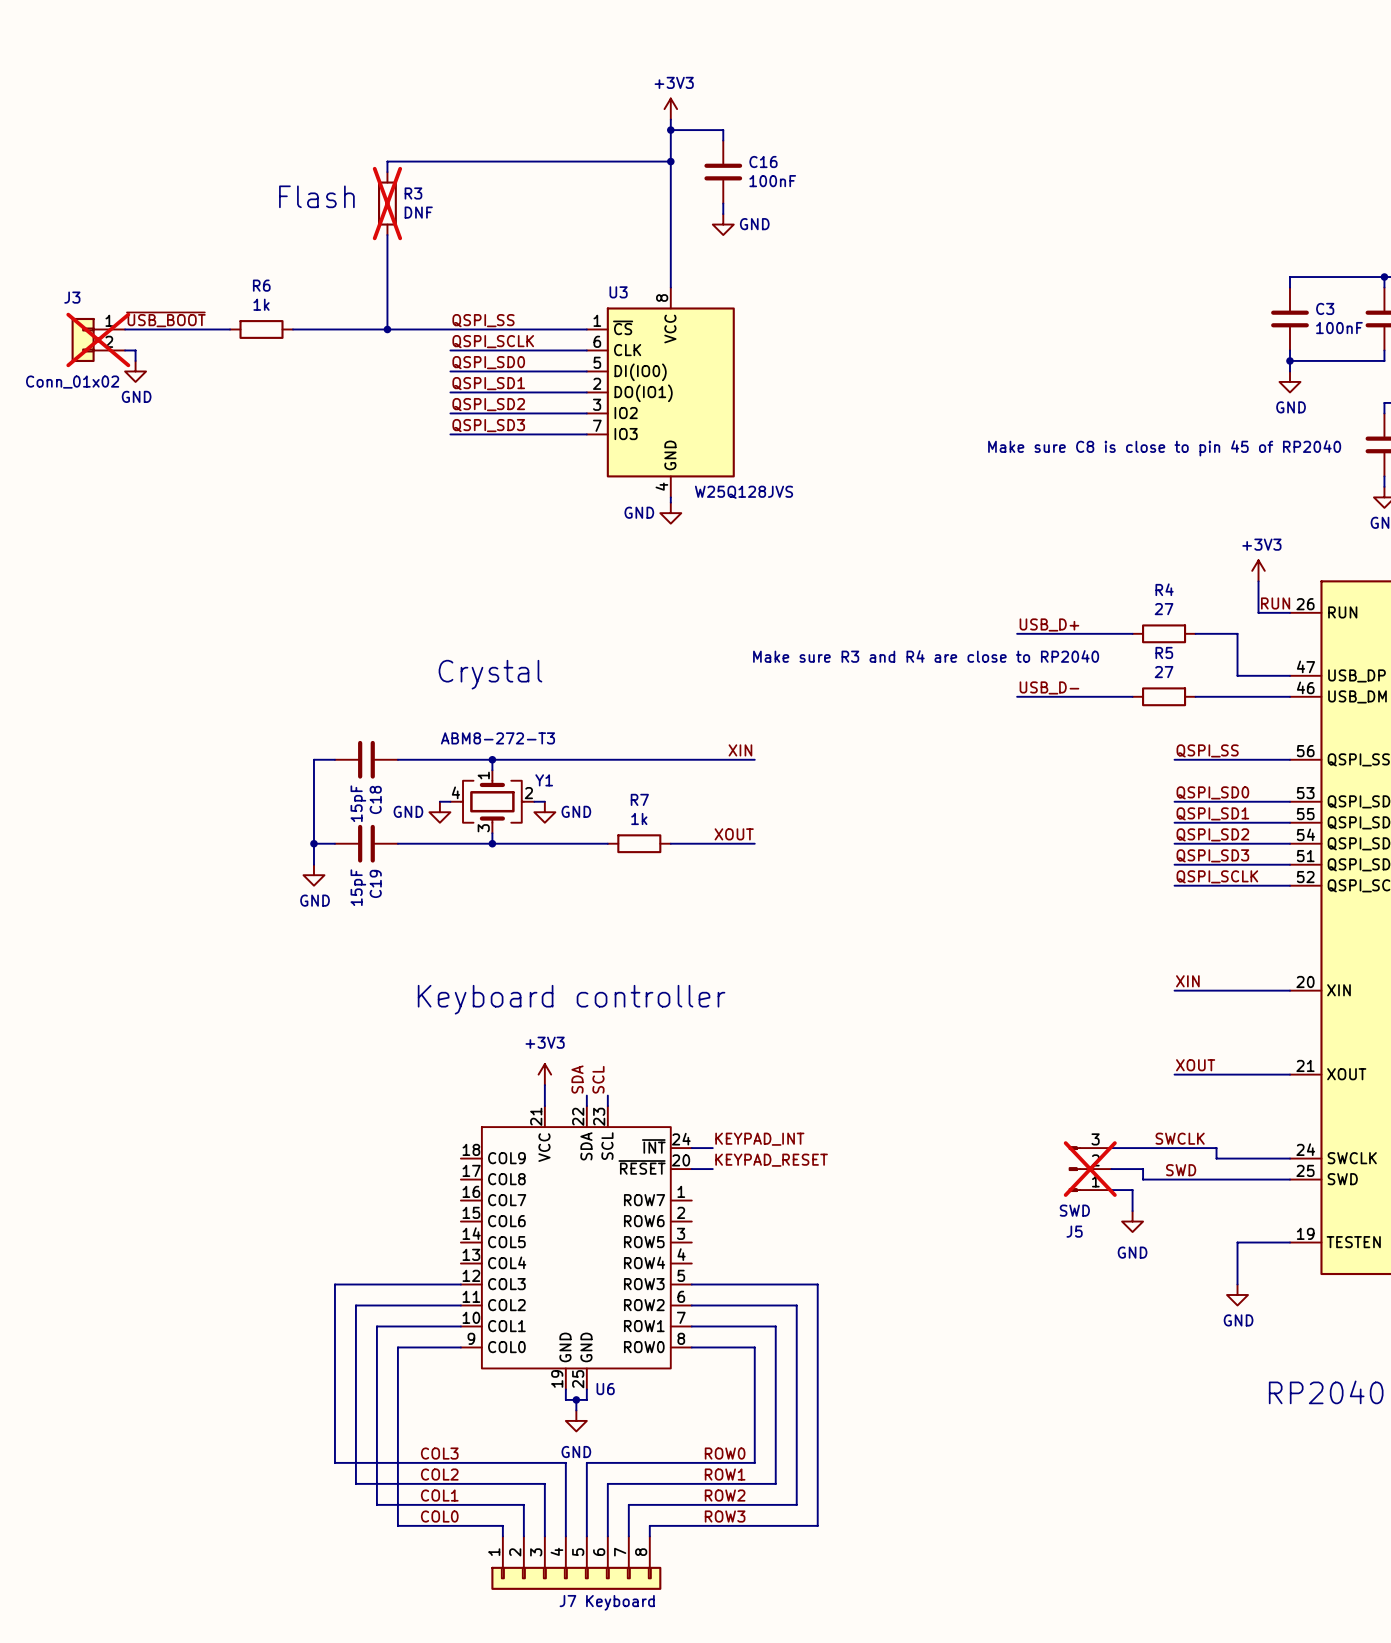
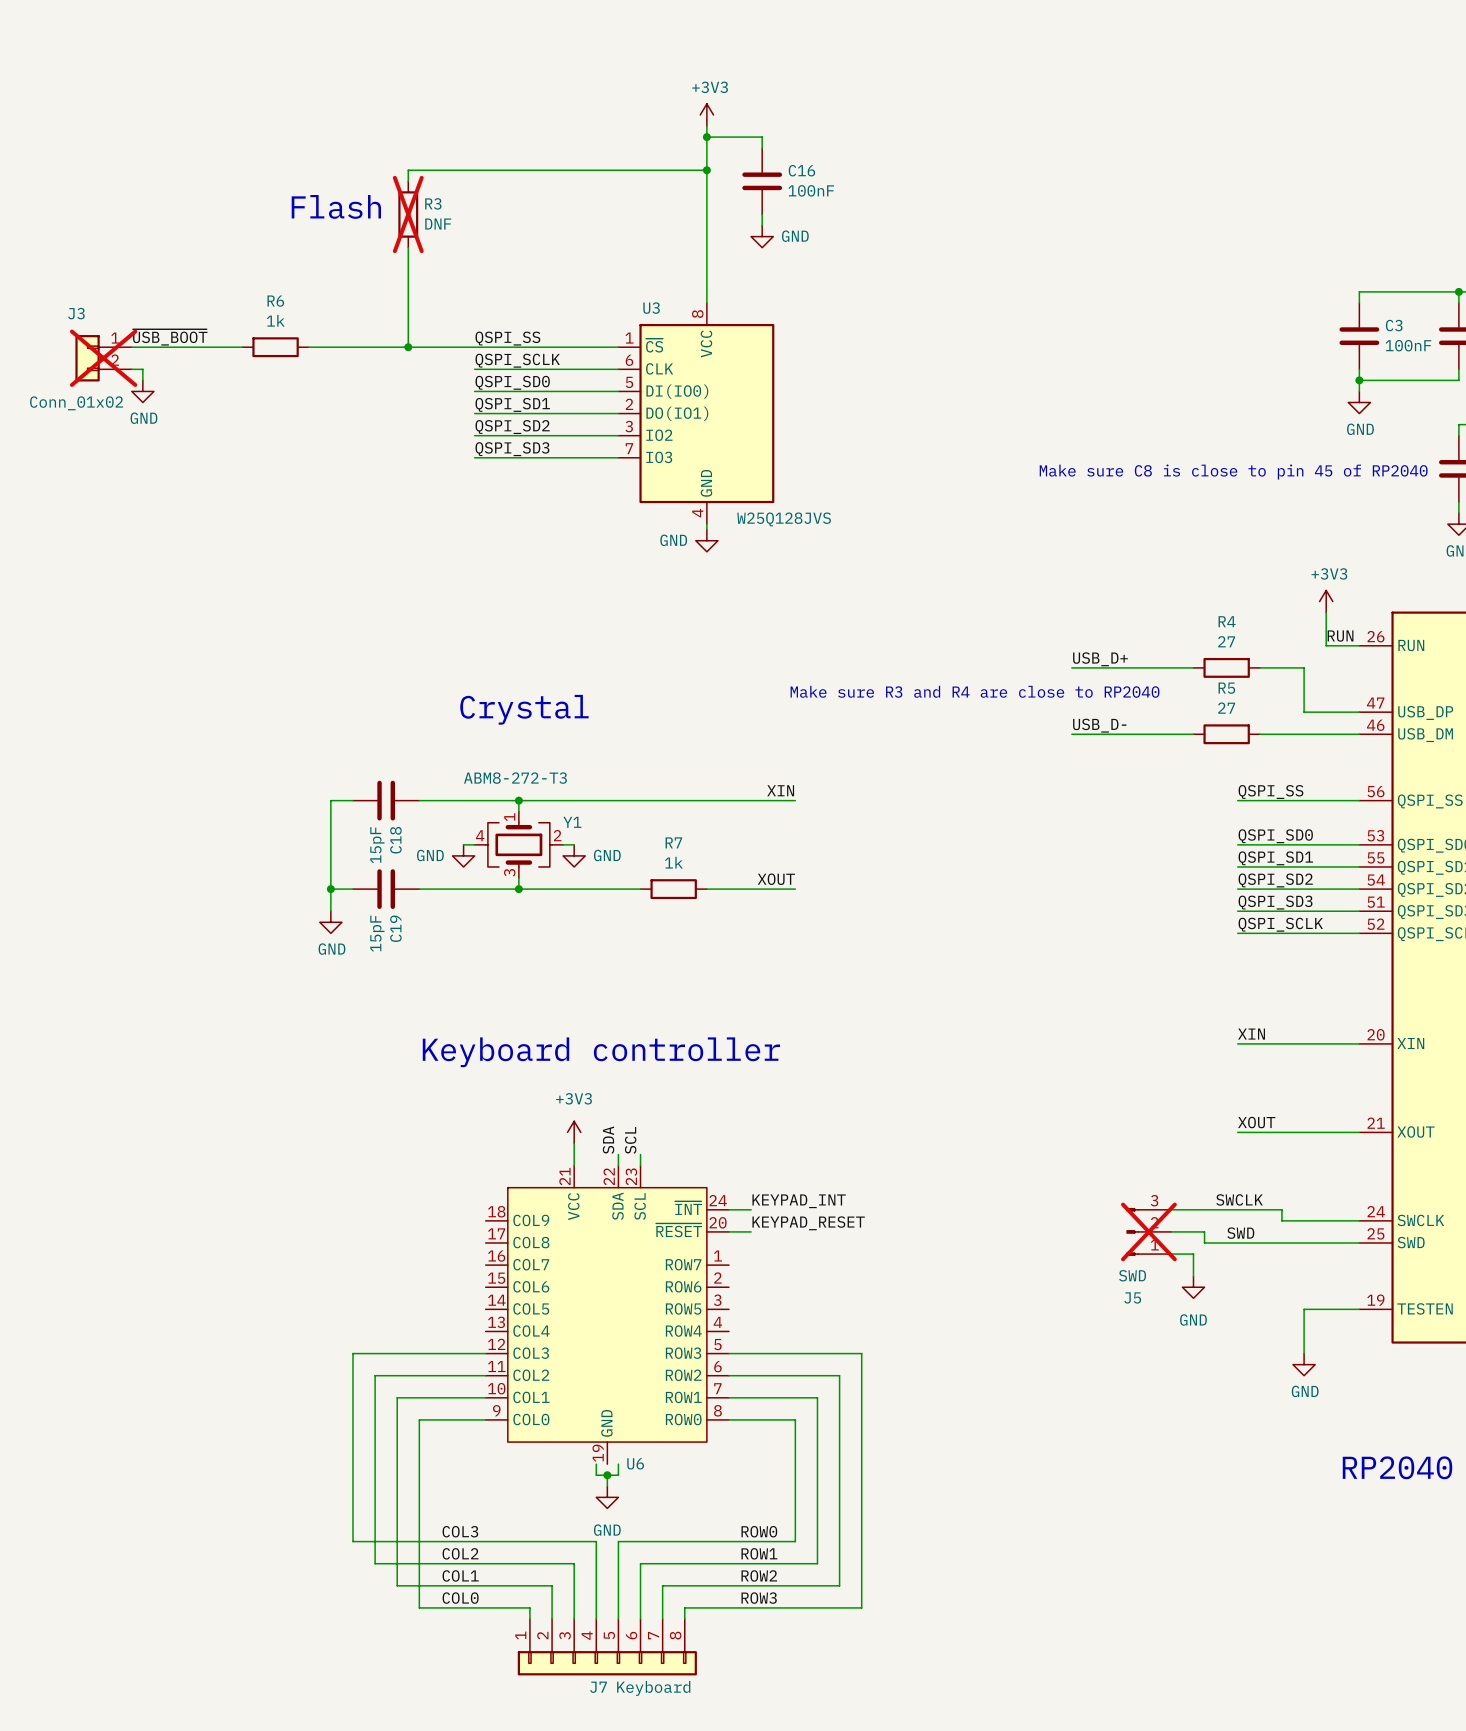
U6 symbol: [460, 1106, 692, 1390] -> [485, 1165, 730, 1465]

